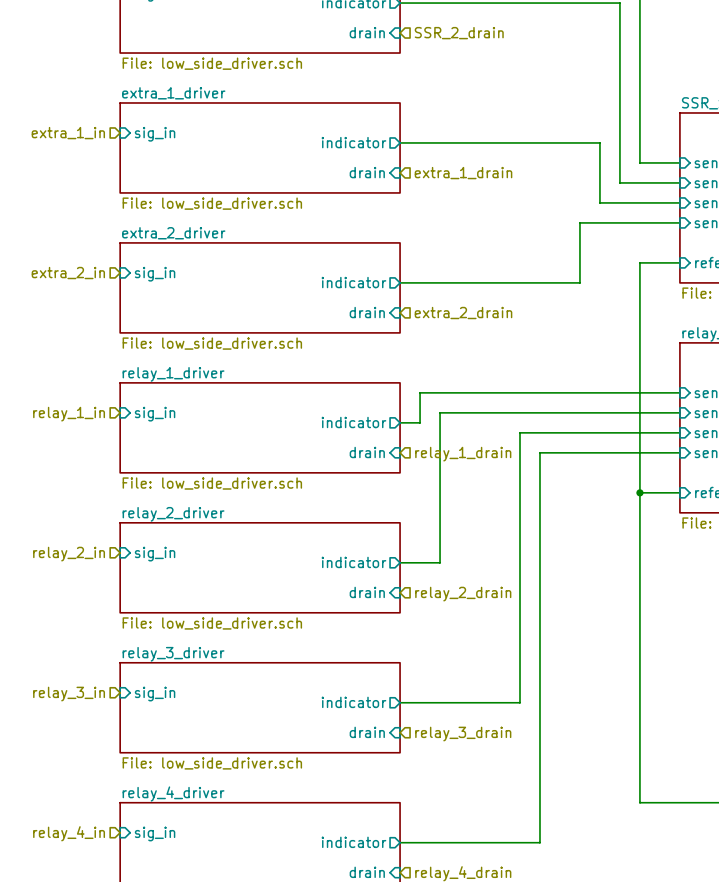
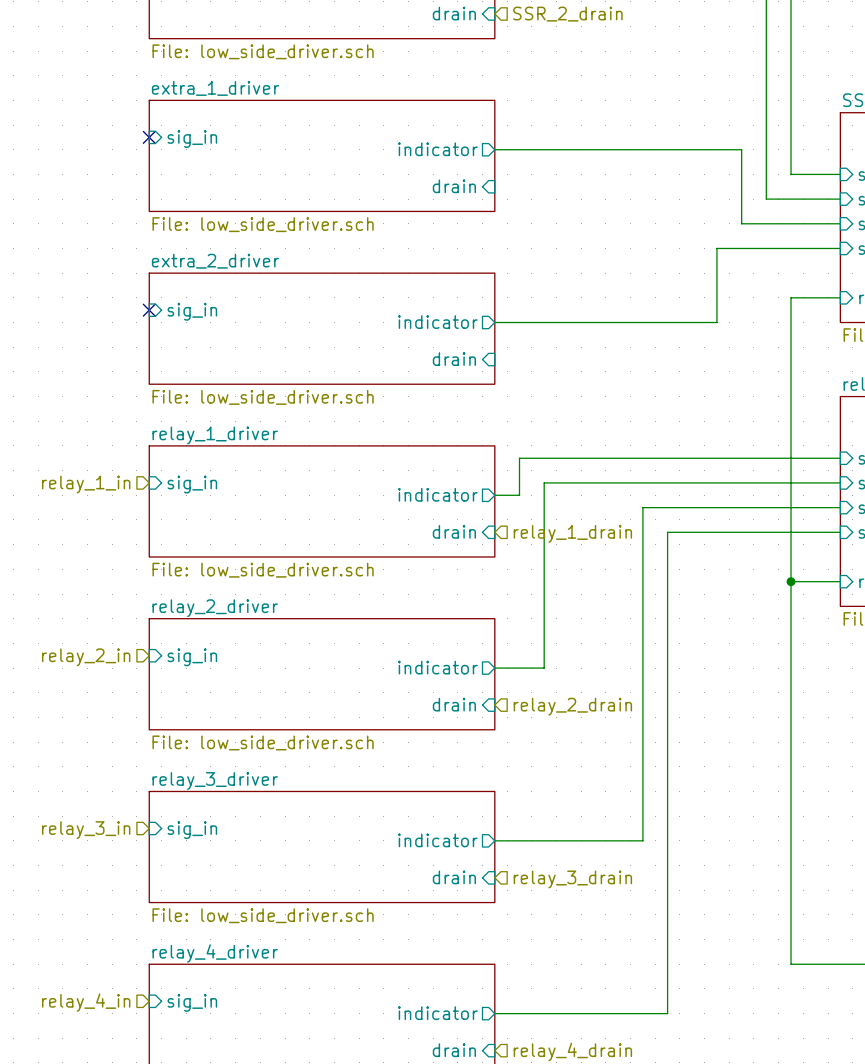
no-connect mark: none -> (149, 137)
hierarchical label: extra_1_in (68, 133) -> none
hierarchical label: extra_1_drain (463, 173) -> none
no-connect mark: none -> (149, 310)
hierarchical label: extra_2_in (68, 273) -> none
hierarchical label: extra_2_drain (463, 313) -> none

